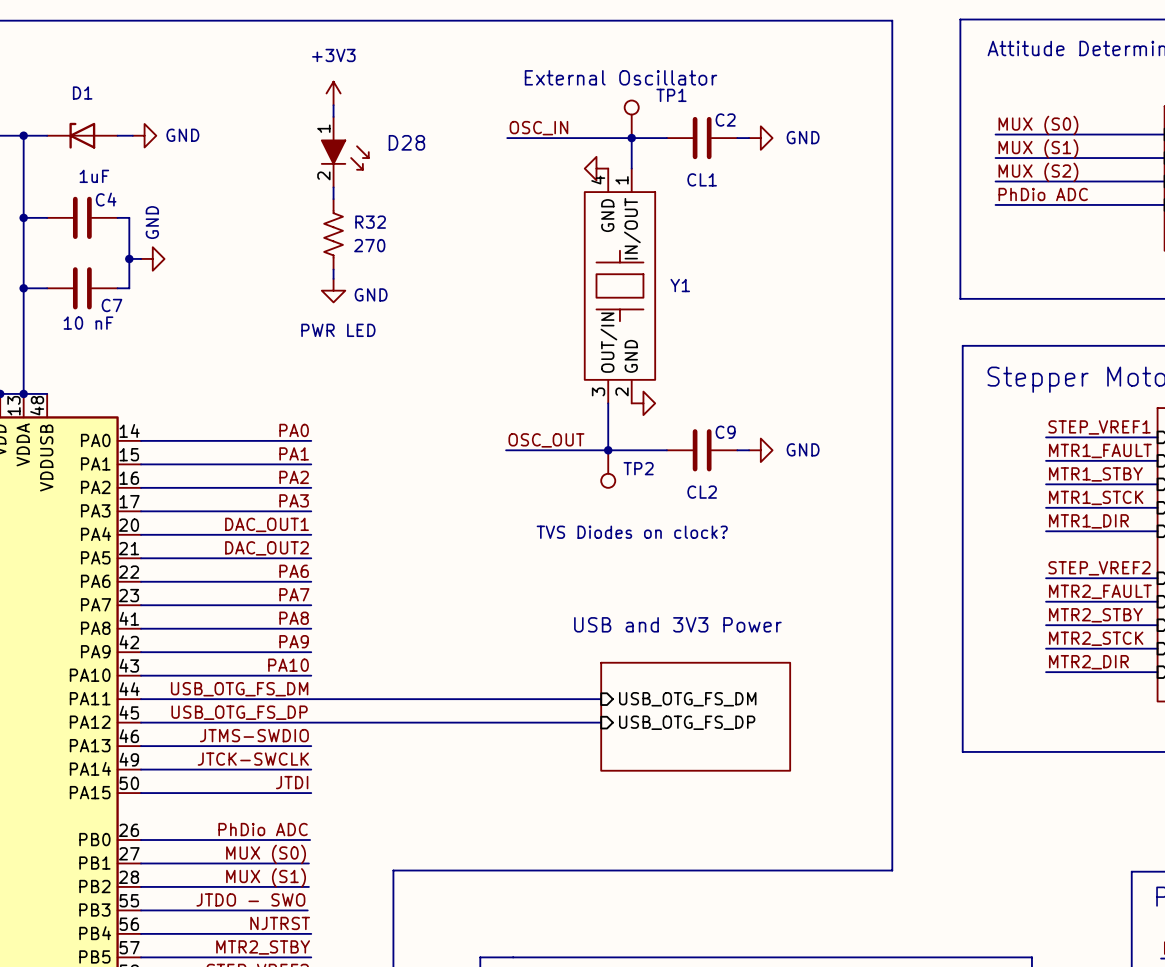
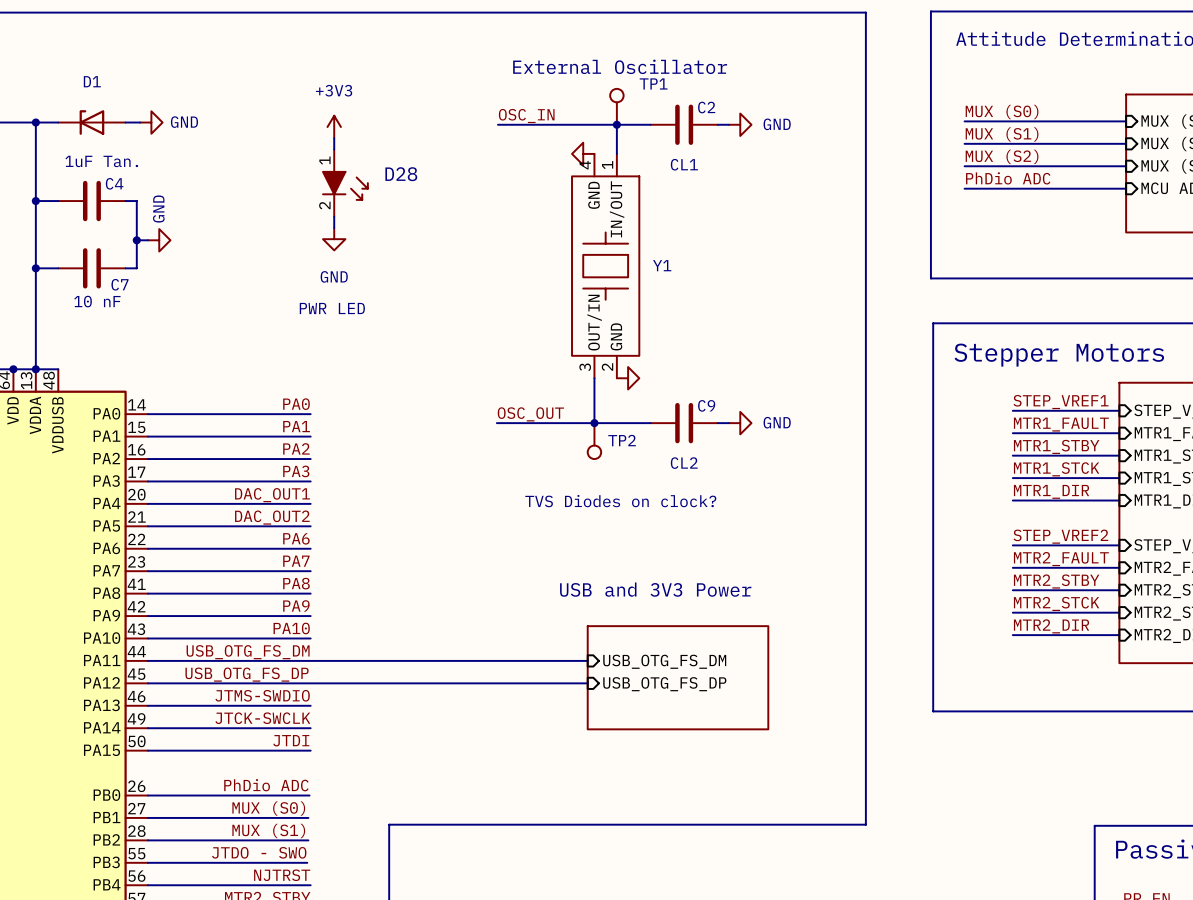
power symbol position: +3V3 (333, 93) -> +3V3 (334, 127)
wire: (333, 105) (333, 116) -> (334, 216) (334, 227)
D28 position: (345, 152) -> (345, 183)
C4 value: 1uF (94, 176) -> 1uF Tan. (101, 161)
R32: 270 (333, 234) -> none
wire: (333, 269) (333, 278) -> none
power symbol position: GND (333, 290) -> GND (334, 239)
power symbol text position: GND (371, 294) -> GND (334, 276)

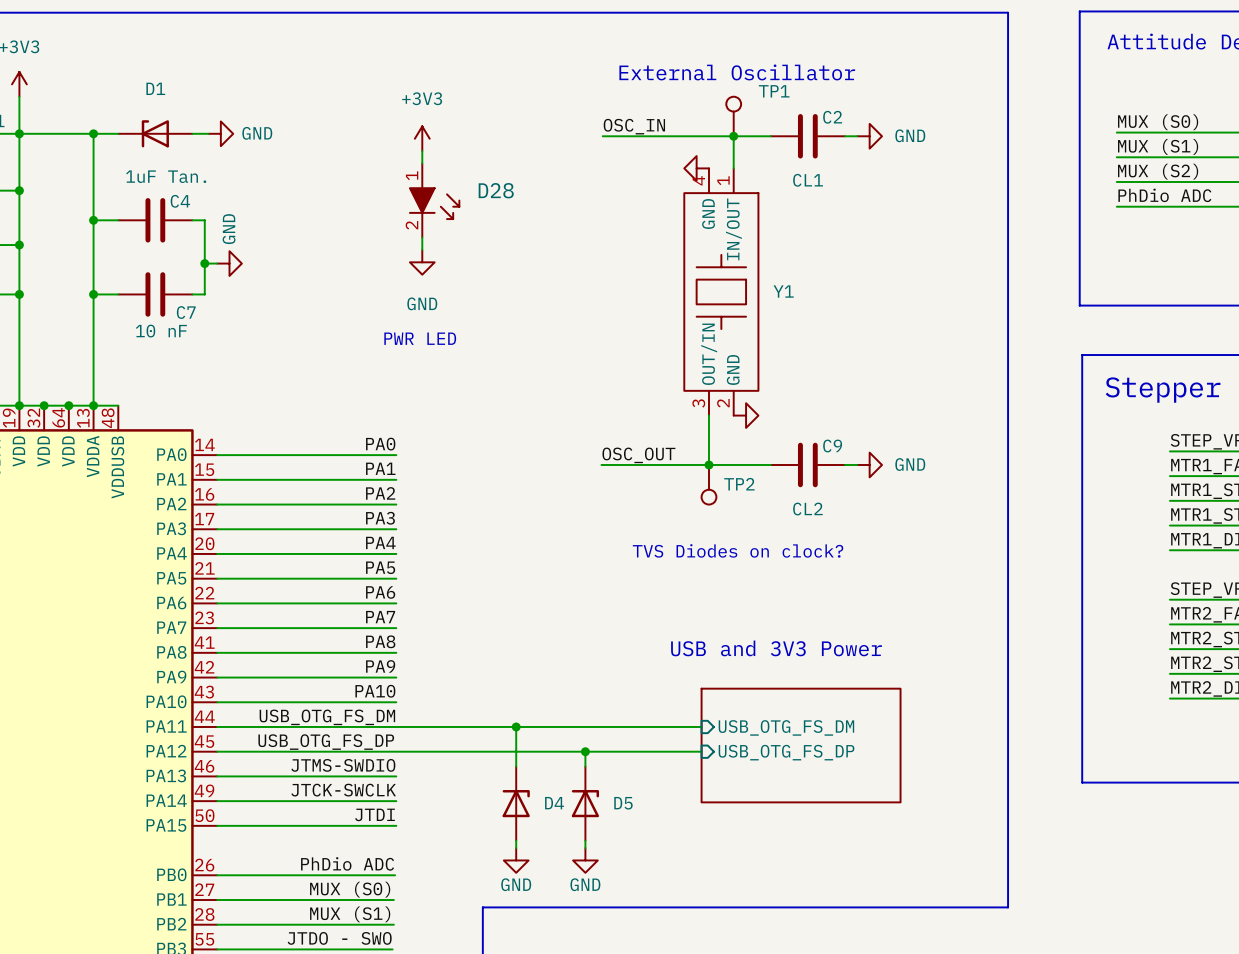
label: DAC_OUT1 (272, 495) -> PA4 (380, 542)
label: DAC_OUT2 (272, 517) -> PA5 (380, 567)
wire: none -> (516, 726) (516, 766)
junction: none -> (516, 726)
wire: none -> (585, 751) (585, 766)
junction: none -> (585, 751)
D4: none -> (516, 803)
D5: none -> (585, 803)
wire: none -> (516, 840) (516, 848)
wire: none -> (585, 840) (585, 848)
power symbol: none -> GND (516, 860)
power symbol: none -> GND (585, 860)

